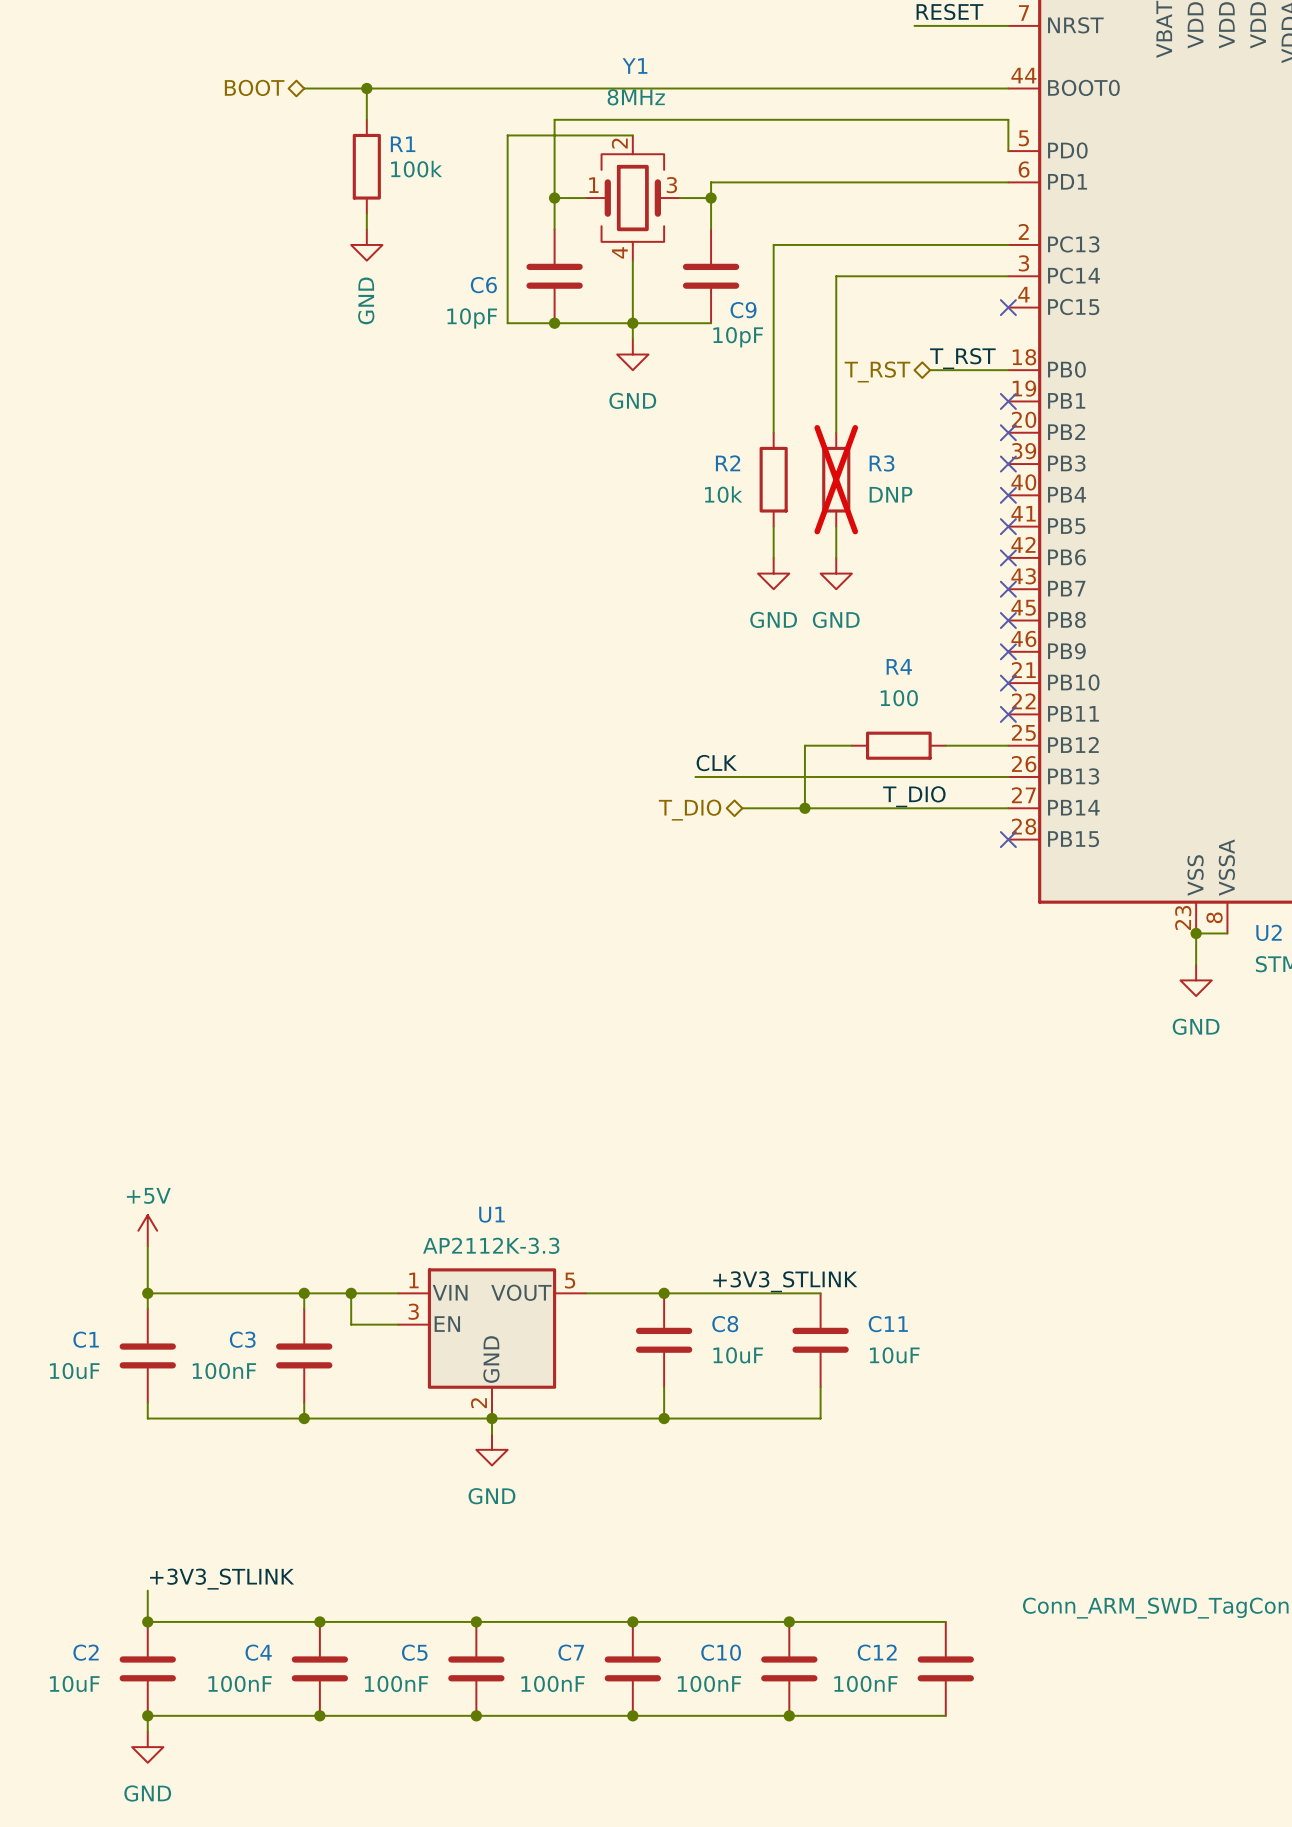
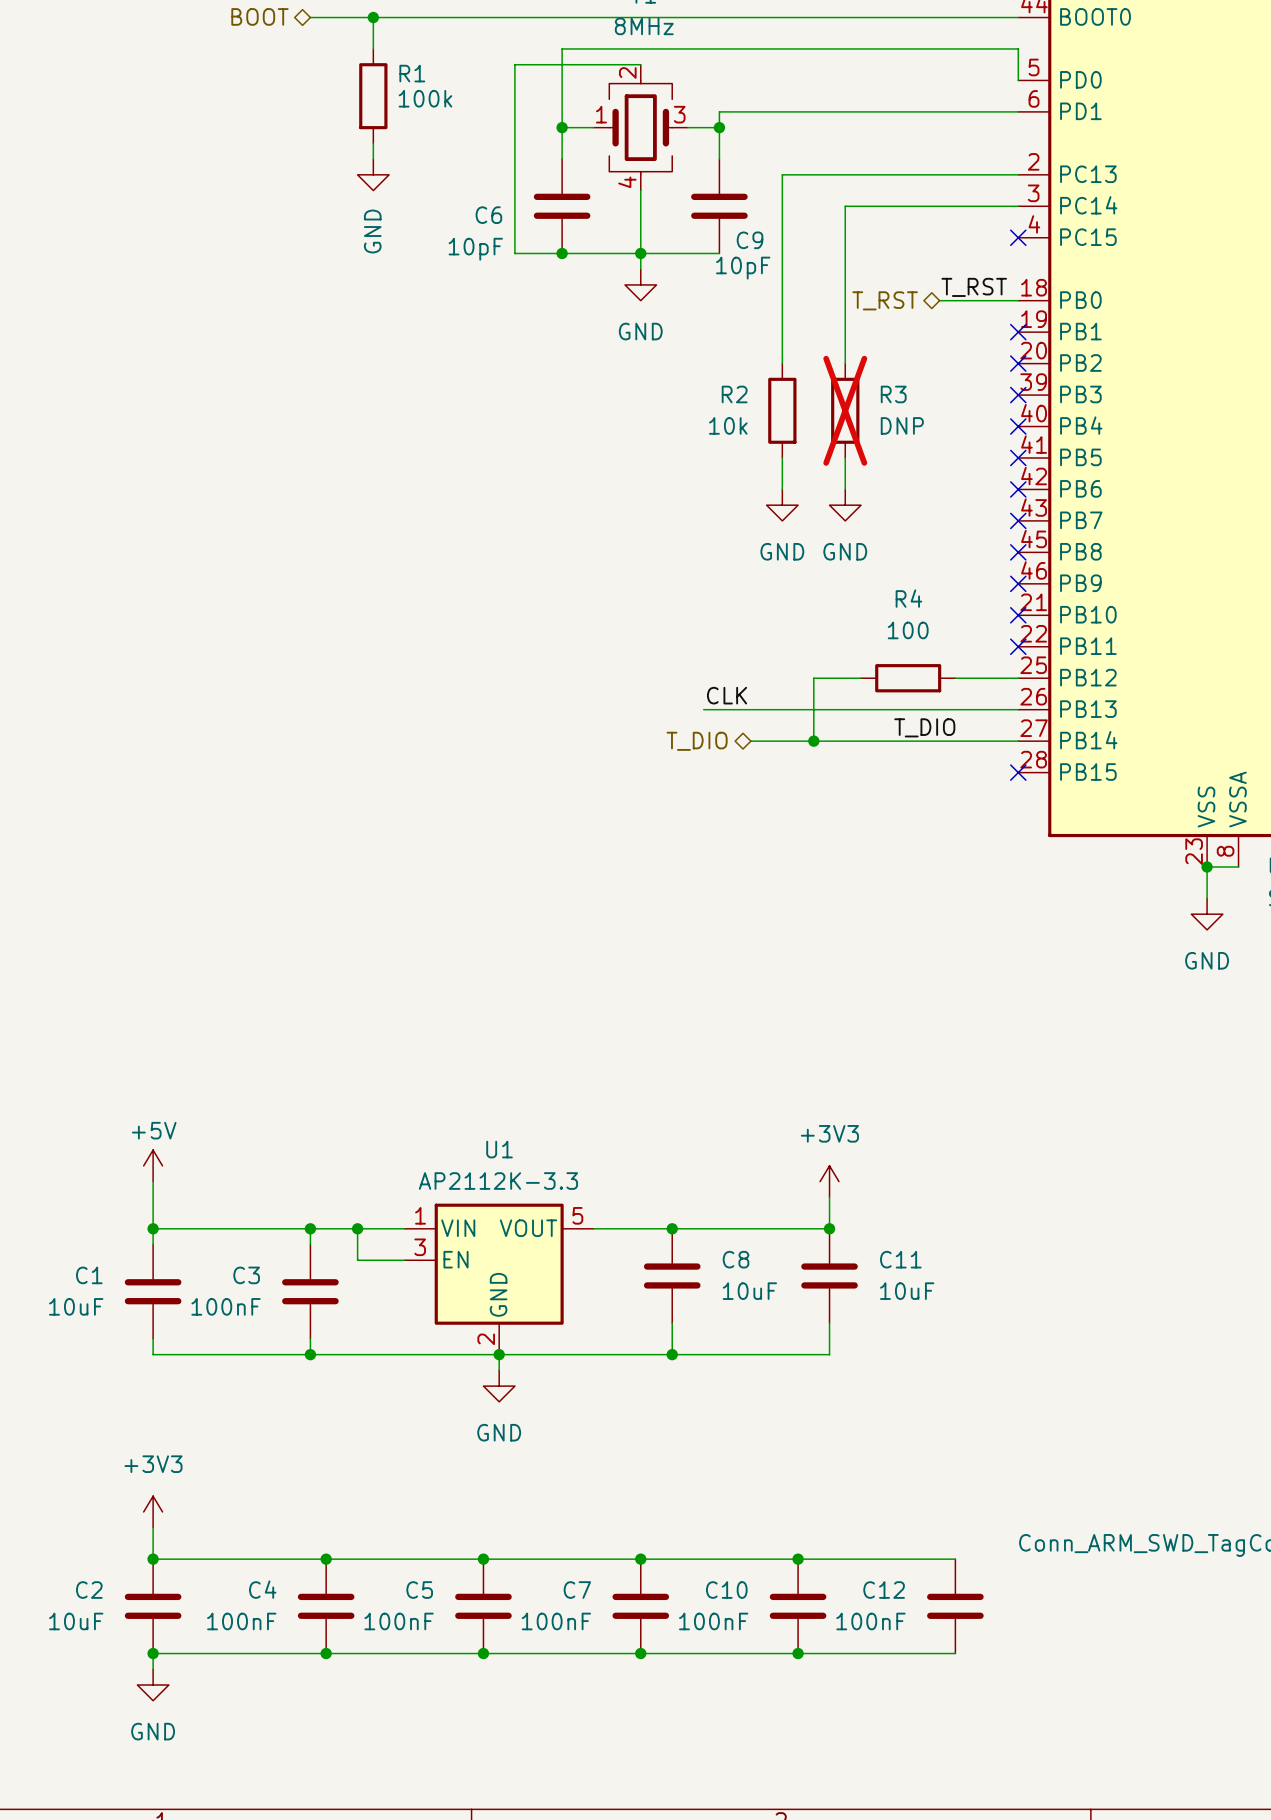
power symbol: none -> +3V3 (829, 1181)
wire: none -> (829, 1197) (829, 1228)
label: +3V3_STLINK (785, 1281) -> none
junction: none -> (829, 1228)
power symbol: none -> +3V3 (153, 1511)
label: +3V3_STLINK (222, 1579) -> none

